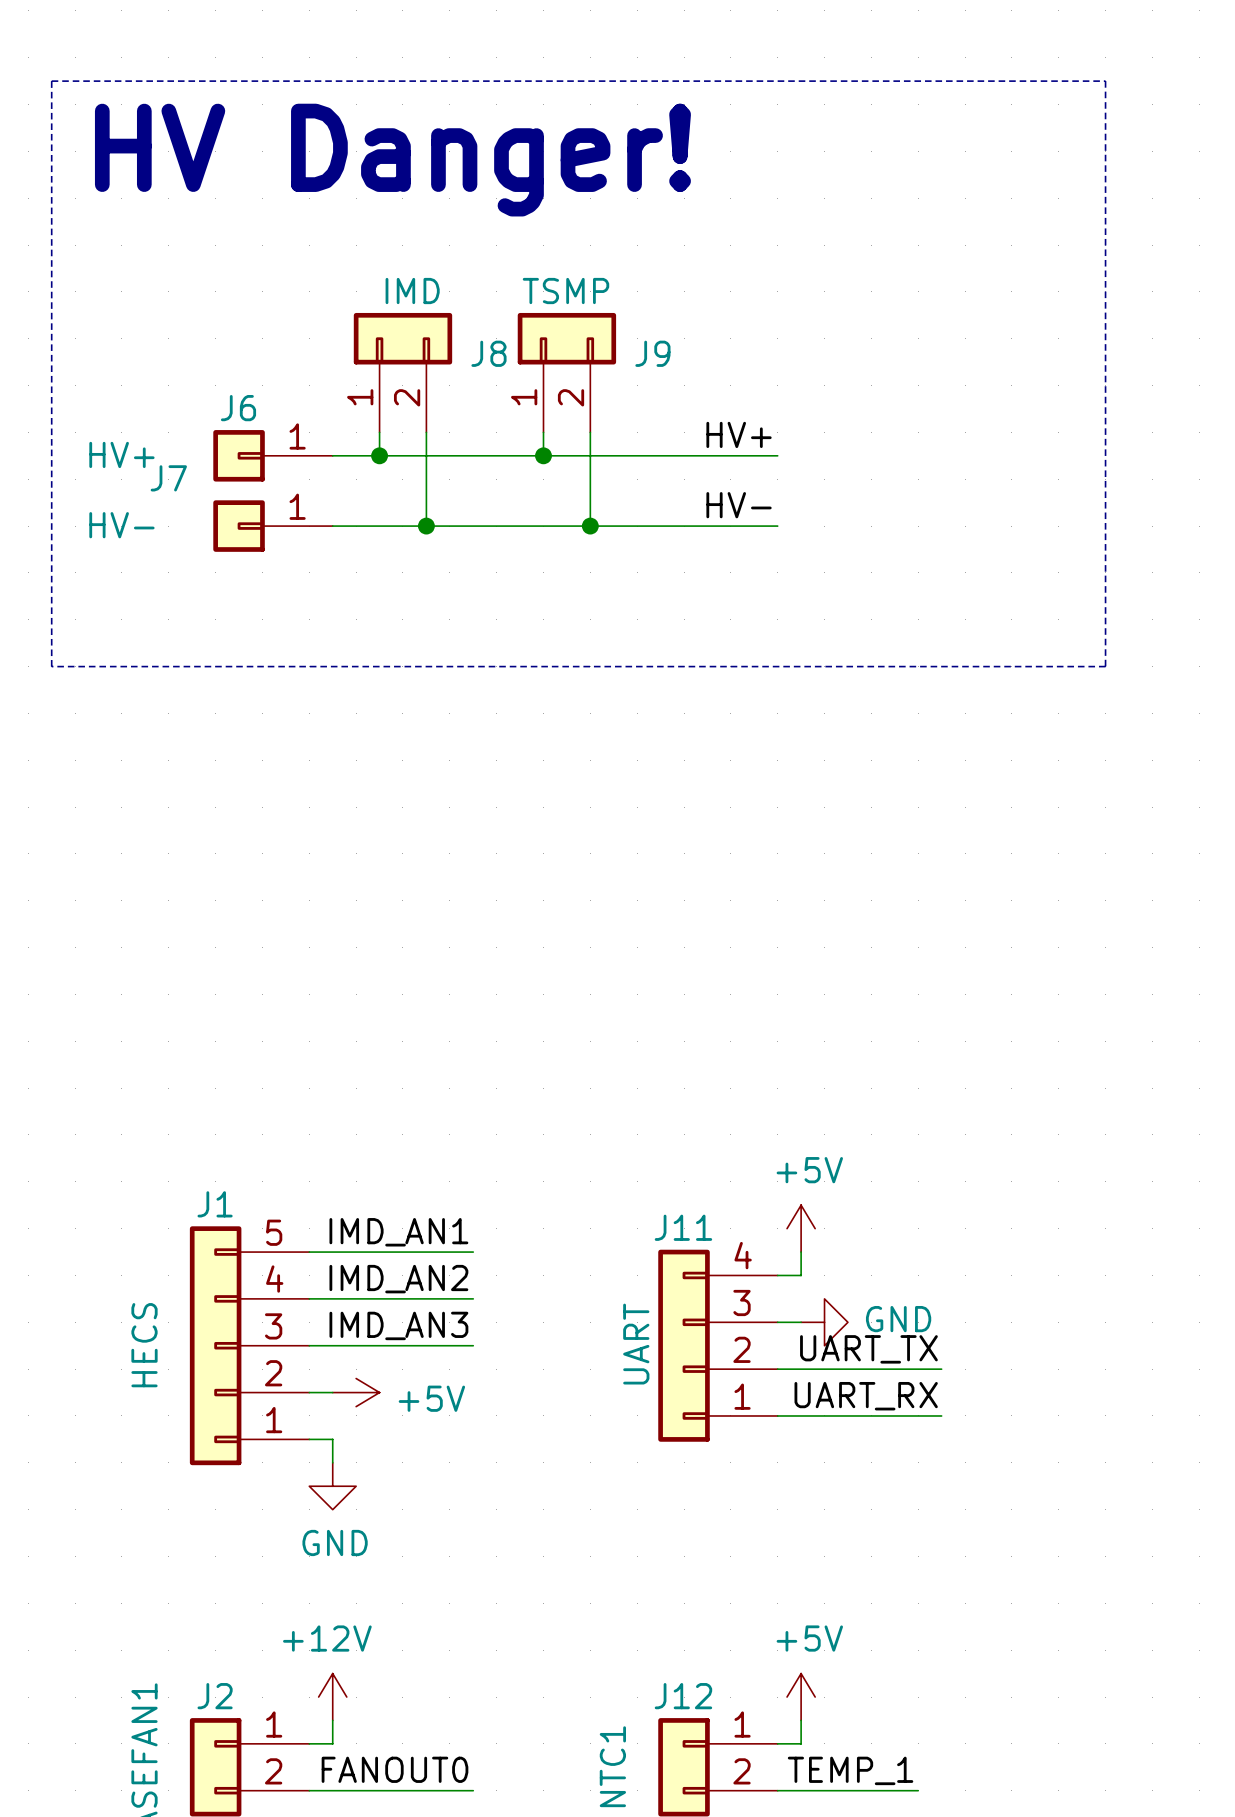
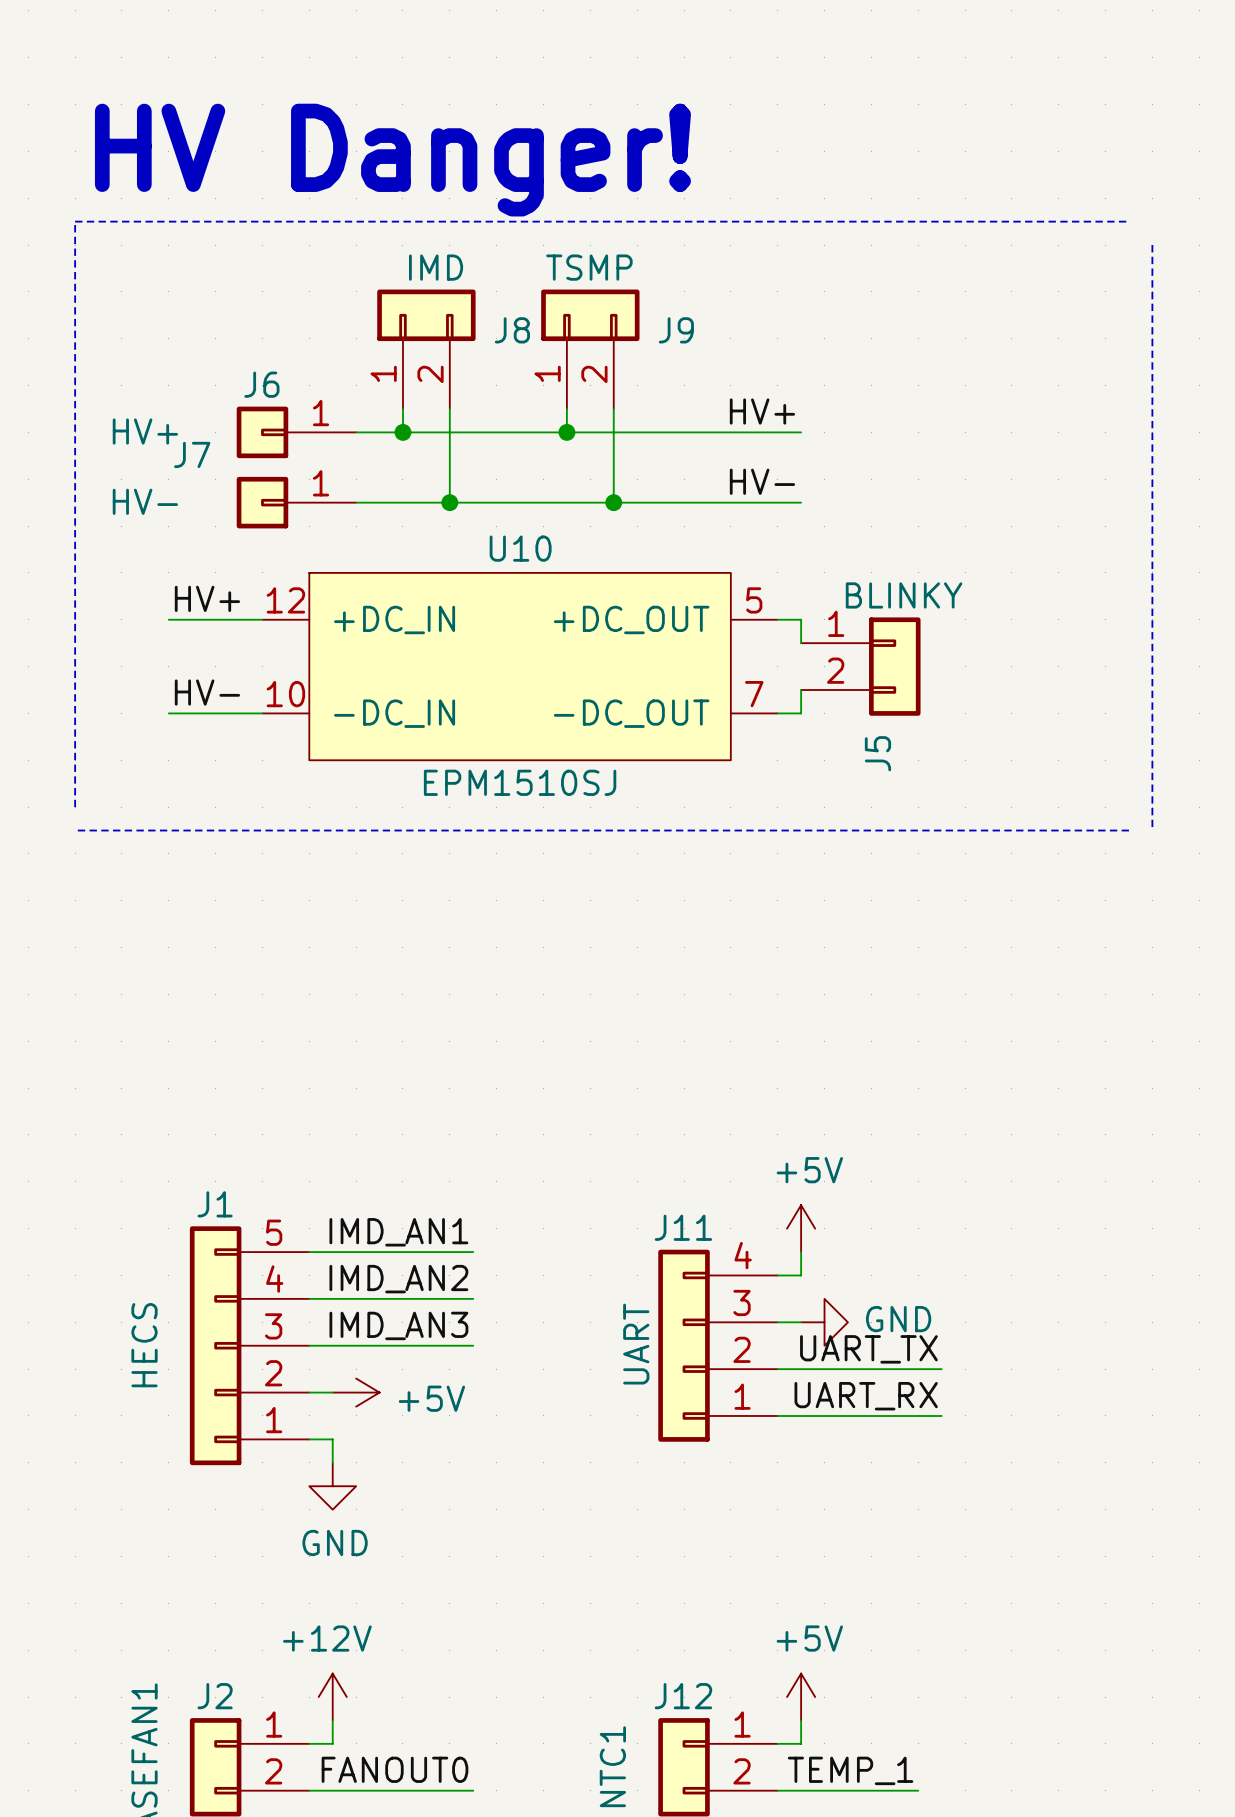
line: (51, 81) (1105, 81) (1105, 666) (51, 666) (51, 81) -> none
line: none -> (1128, 221) (75, 221) (75, 807)
line: none -> (1152, 245) (1152, 830)
J8 position: (402, 372) -> (426, 349)
J9 position: (566, 372) -> (590, 349)
wire: (379, 432) (379, 455) -> (402, 408) (402, 432)
wire: (426, 432) (426, 526) -> (449, 408) (449, 502)
wire: (543, 432) (543, 455) -> (566, 408) (566, 432)
wire: (590, 432) (590, 526) -> (613, 408) (613, 502)
label position: HV+ (739, 434) -> HV+ (762, 411)
J6 position: (273, 455) -> (296, 432)
wire: (332, 455) (777, 455) -> (356, 432) (801, 432)
junction position: (379, 455) -> (402, 432)
junction position: (543, 455) -> (566, 432)
label position: HV- (739, 505) -> HV- (762, 481)
J7 position: (273, 526) -> (296, 502)
wire: (332, 526) (777, 526) -> (356, 502) (801, 502)
junction position: (426, 526) -> (449, 502)
junction position: (590, 526) -> (613, 502)
label: none -> HV+ (207, 598)
wire: none -> (168, 619) (262, 619)
wire: none -> (777, 619) (801, 619) (801, 643)
U10: none -> EPM1510SJ (520, 666)
J5: none -> BLINKY (860, 666)
wire: none -> (801, 690) (801, 713) (777, 713)
label: none -> HV- (207, 692)
wire: none -> (168, 713) (262, 713)
line: none -> (75, 830) (1128, 830)

